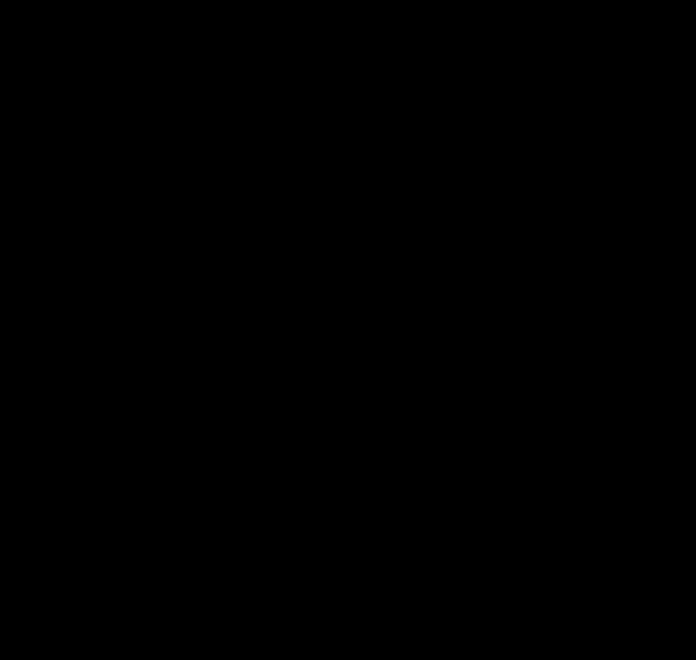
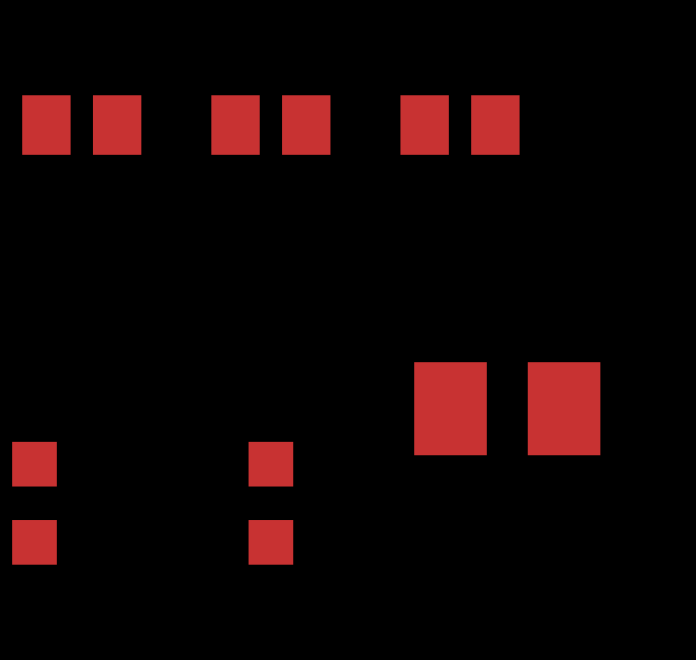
part: none -> (81, 125)
part: none -> (270, 125)
part: none -> (460, 125)
part: none -> (507, 408)
part: none -> (34, 503)
part: none -> (270, 503)

